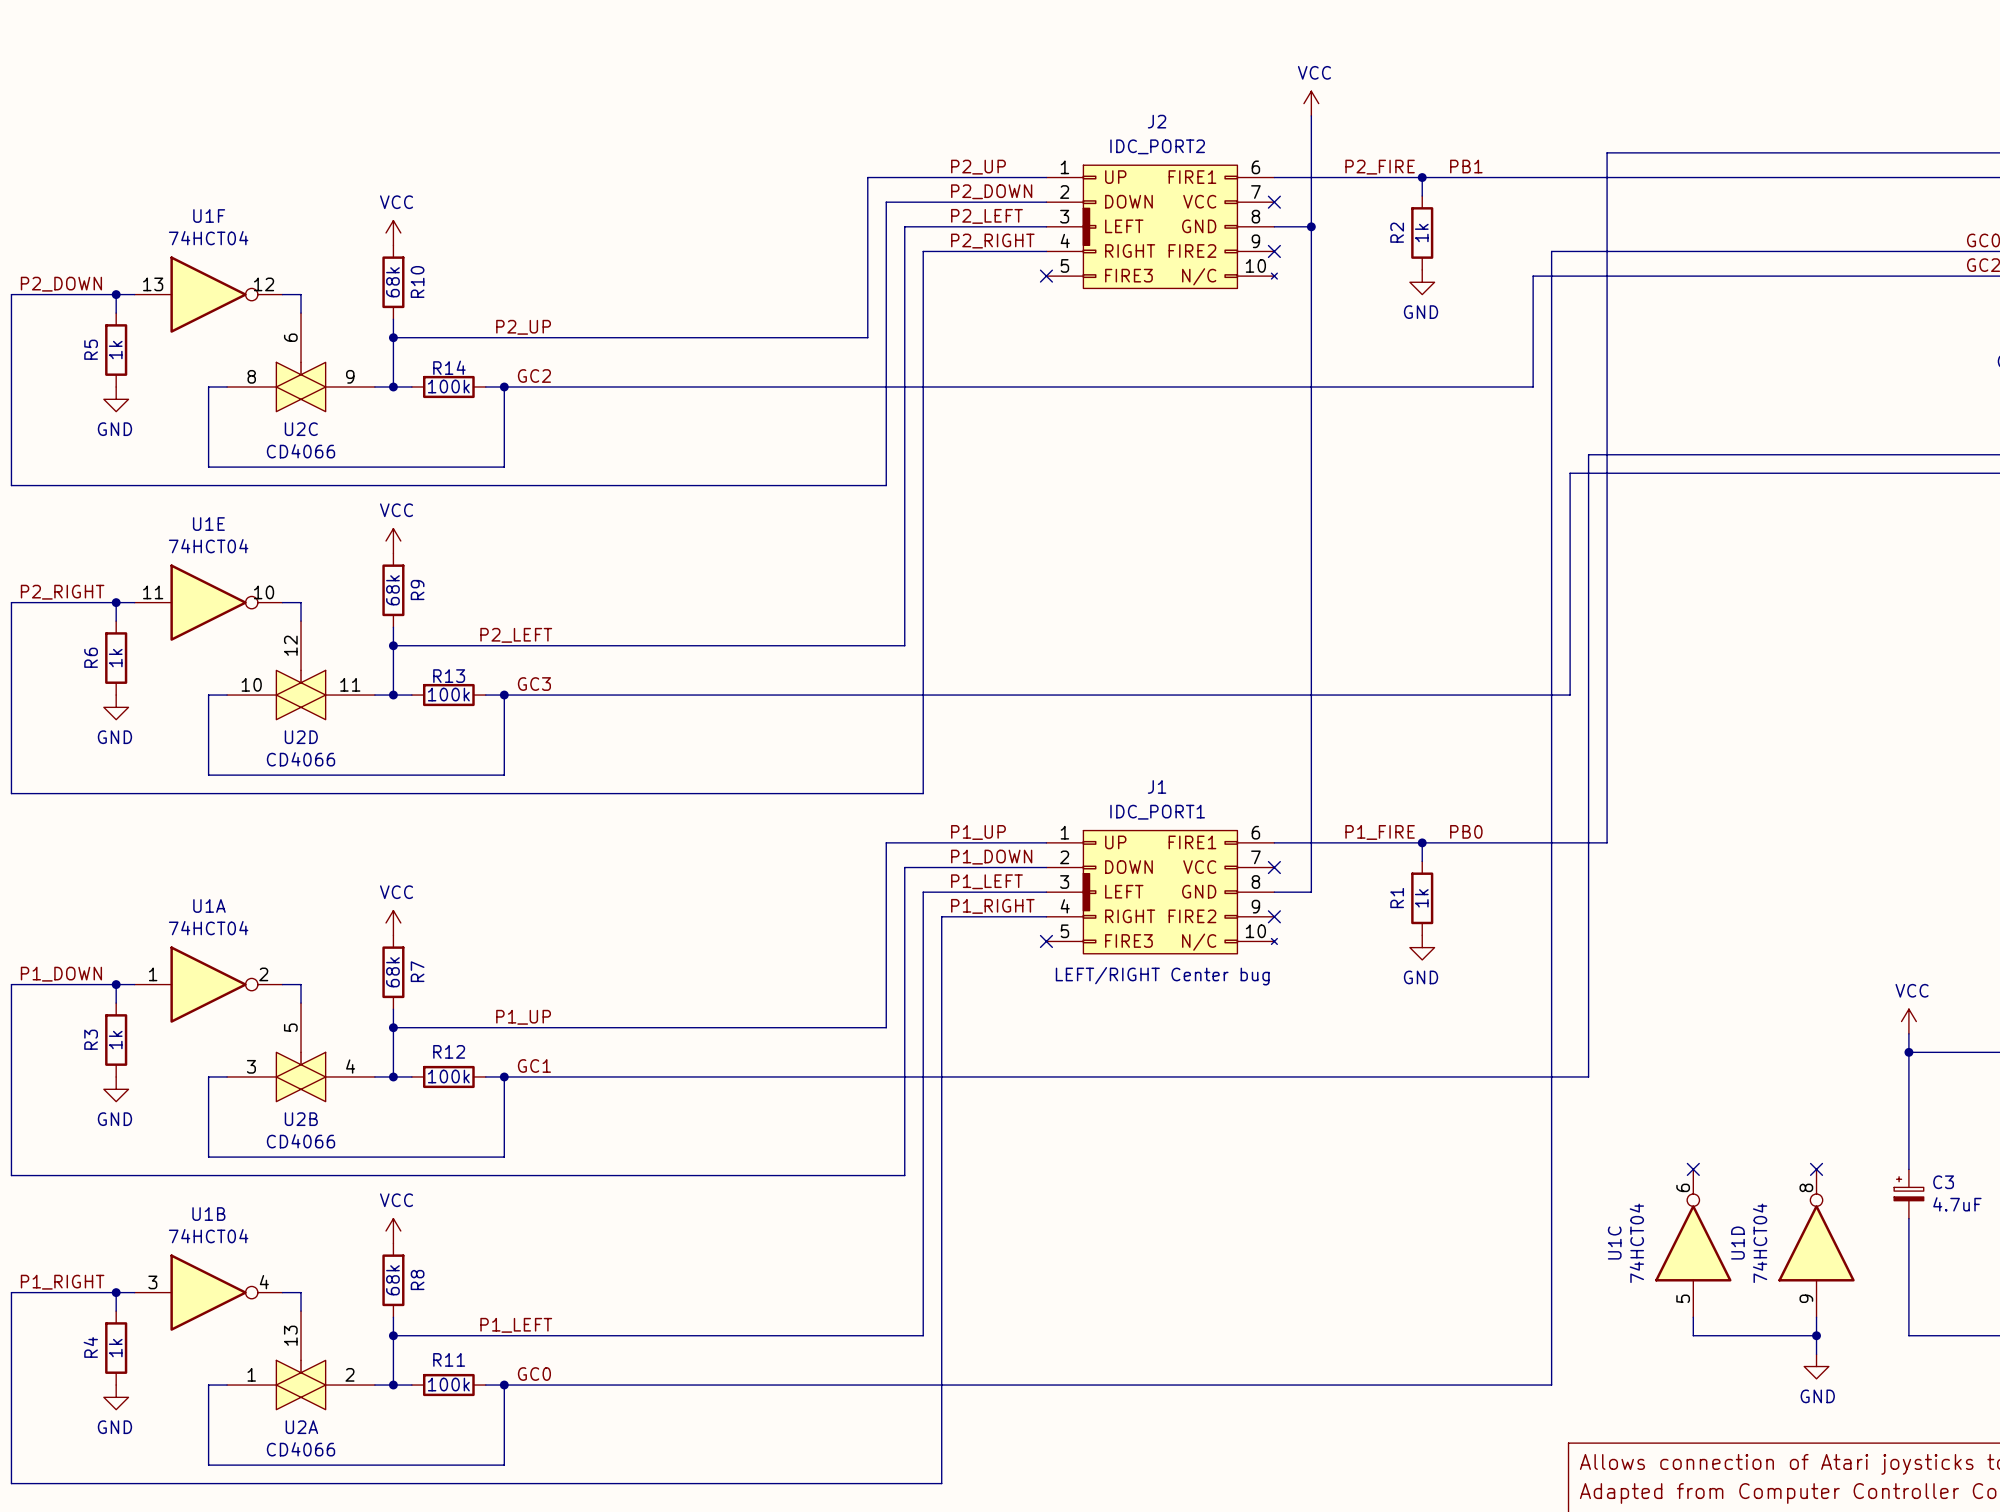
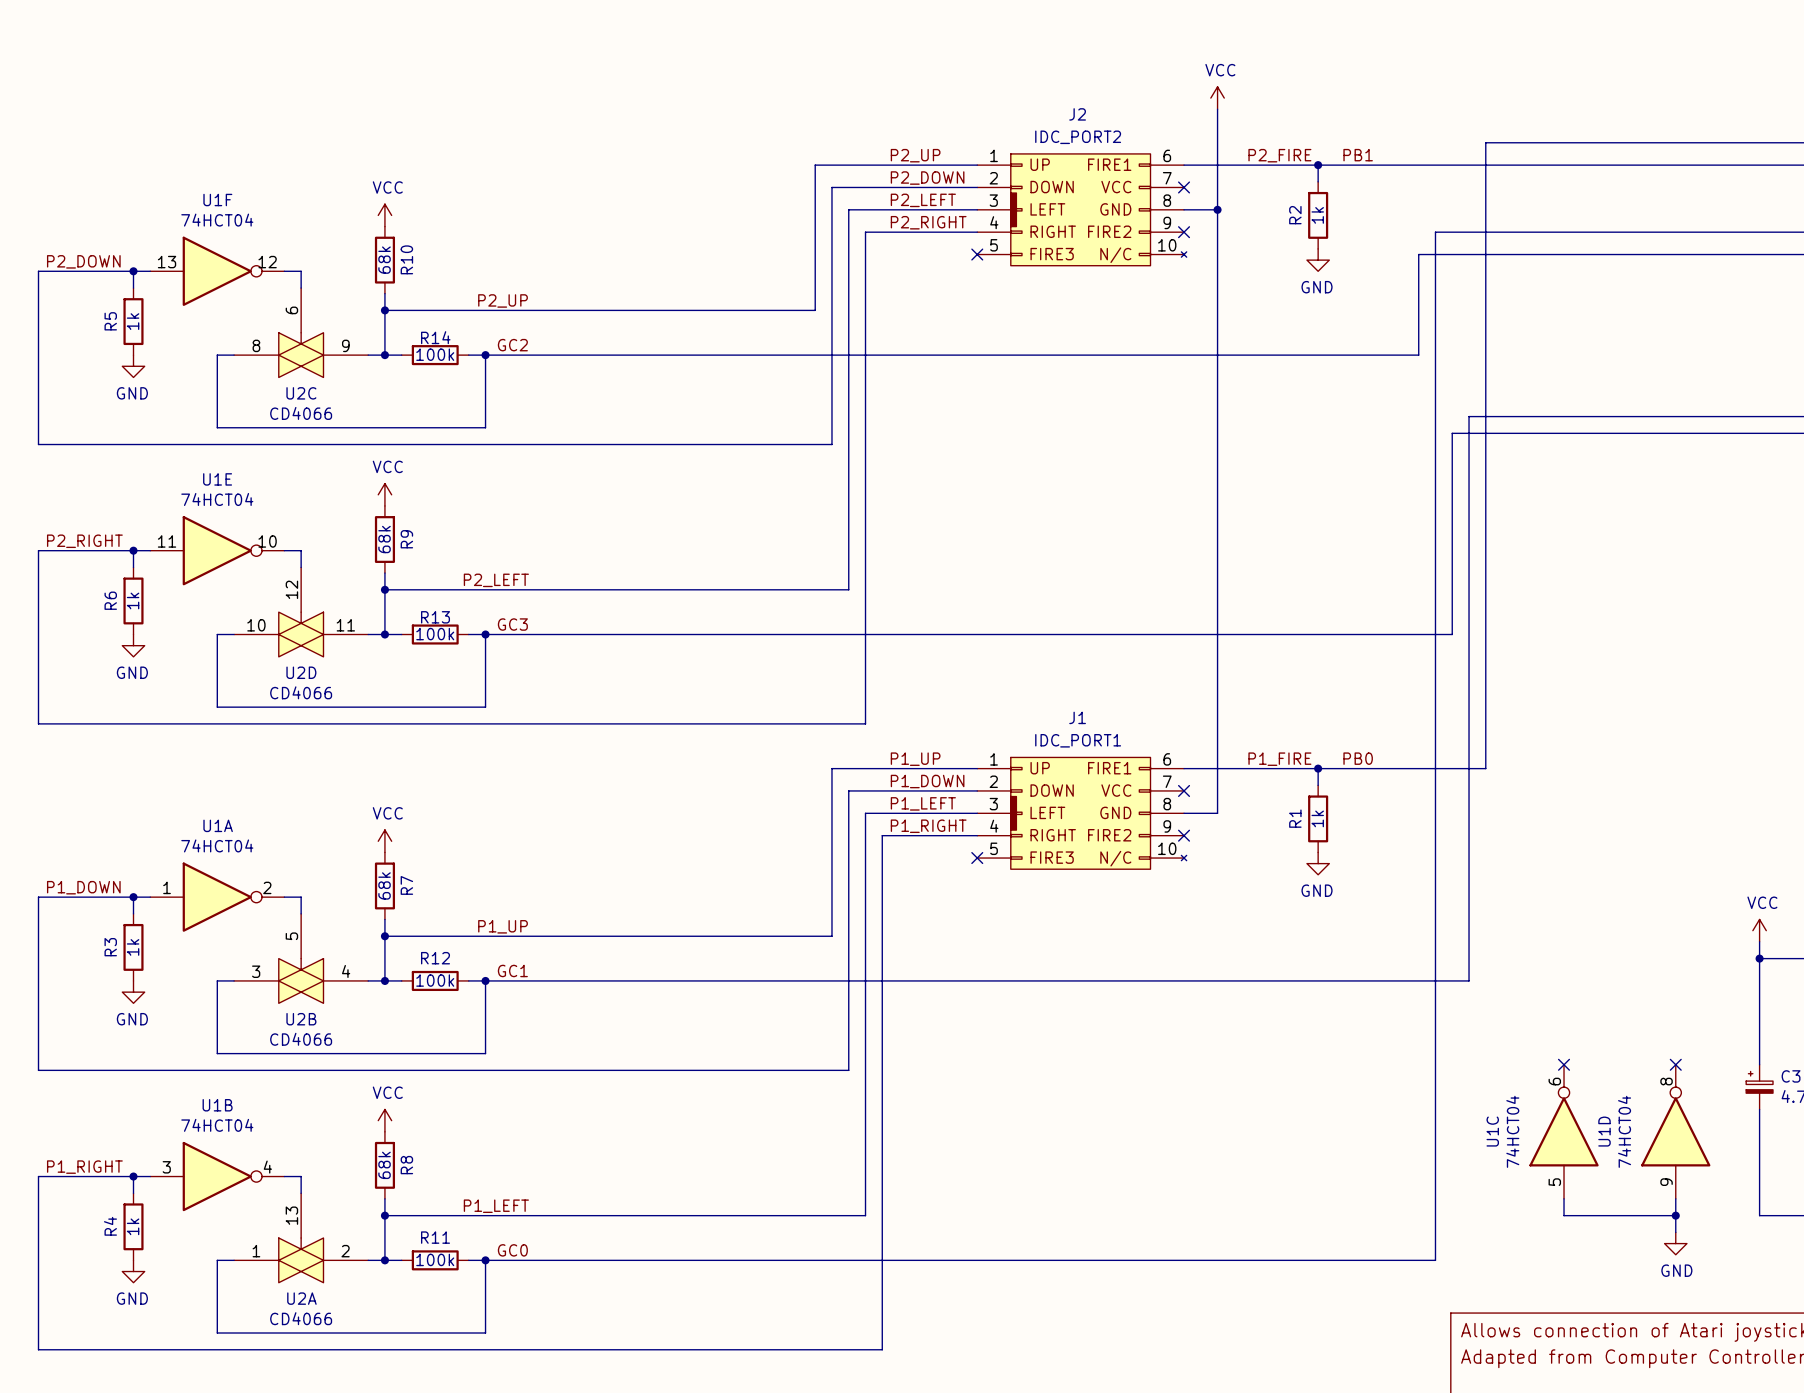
text: LEFT/RIGHT Center bug (1162, 976) -> none

